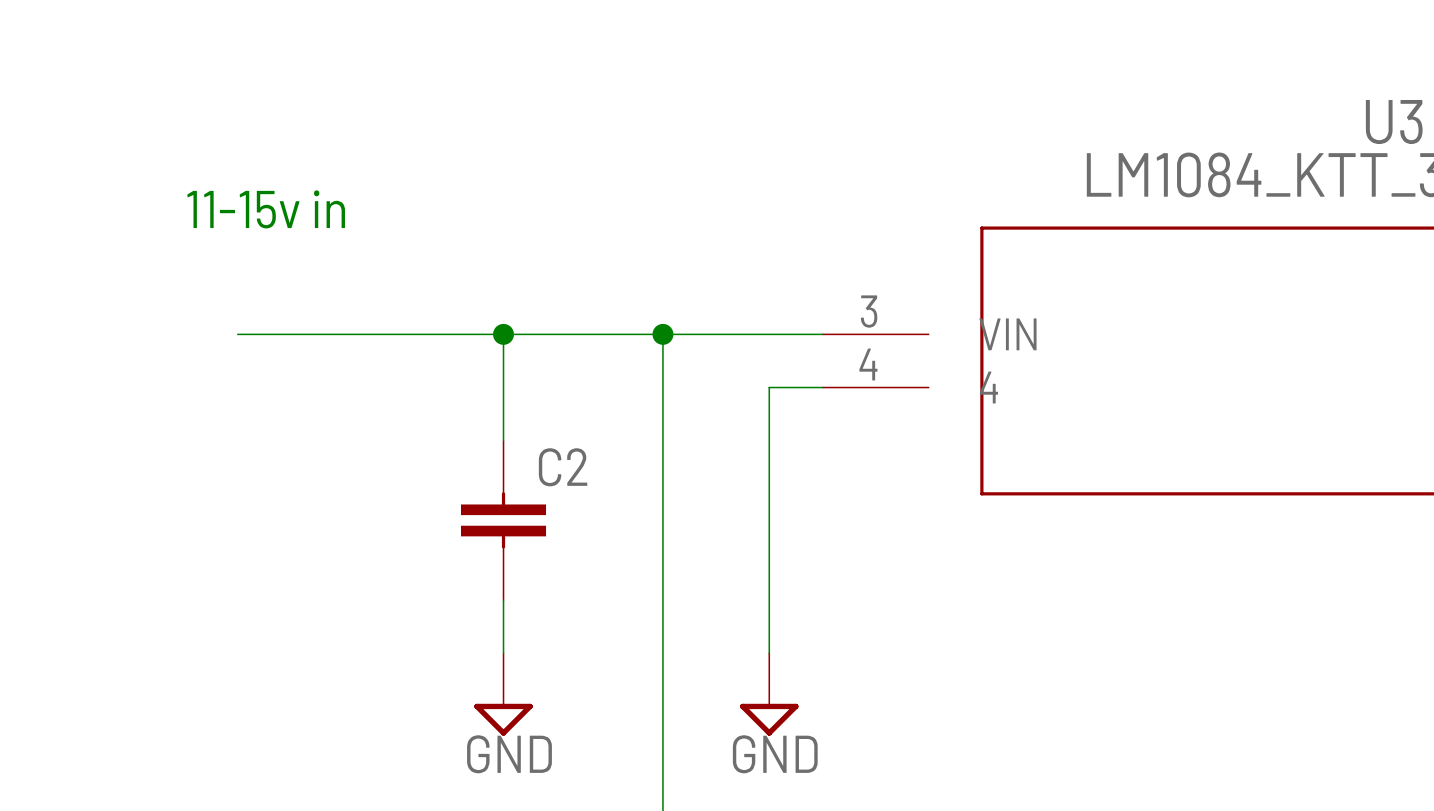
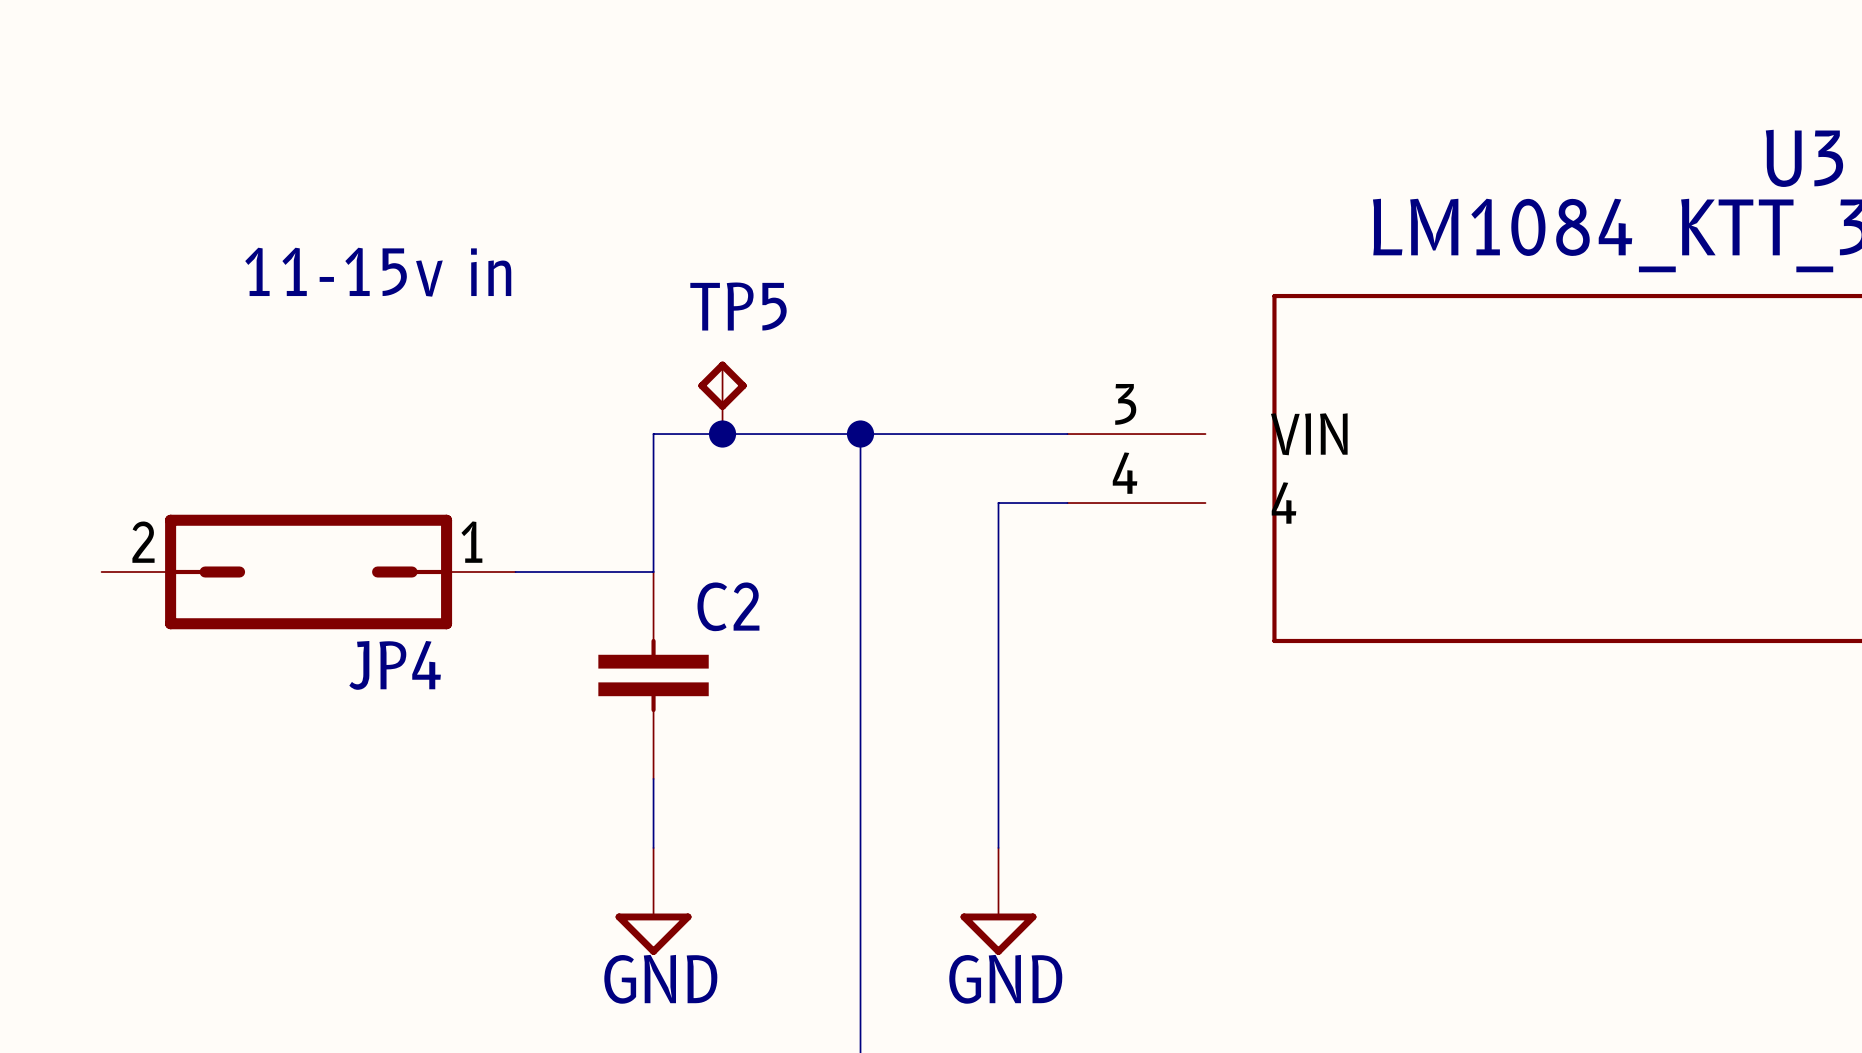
TP5: none -> (722, 397)
wire: (237, 334) (503, 334) -> none
junction position: (503, 334) -> (722, 434)
JP4: none -> (308, 572)
wire: none -> (515, 572) (653, 572)

